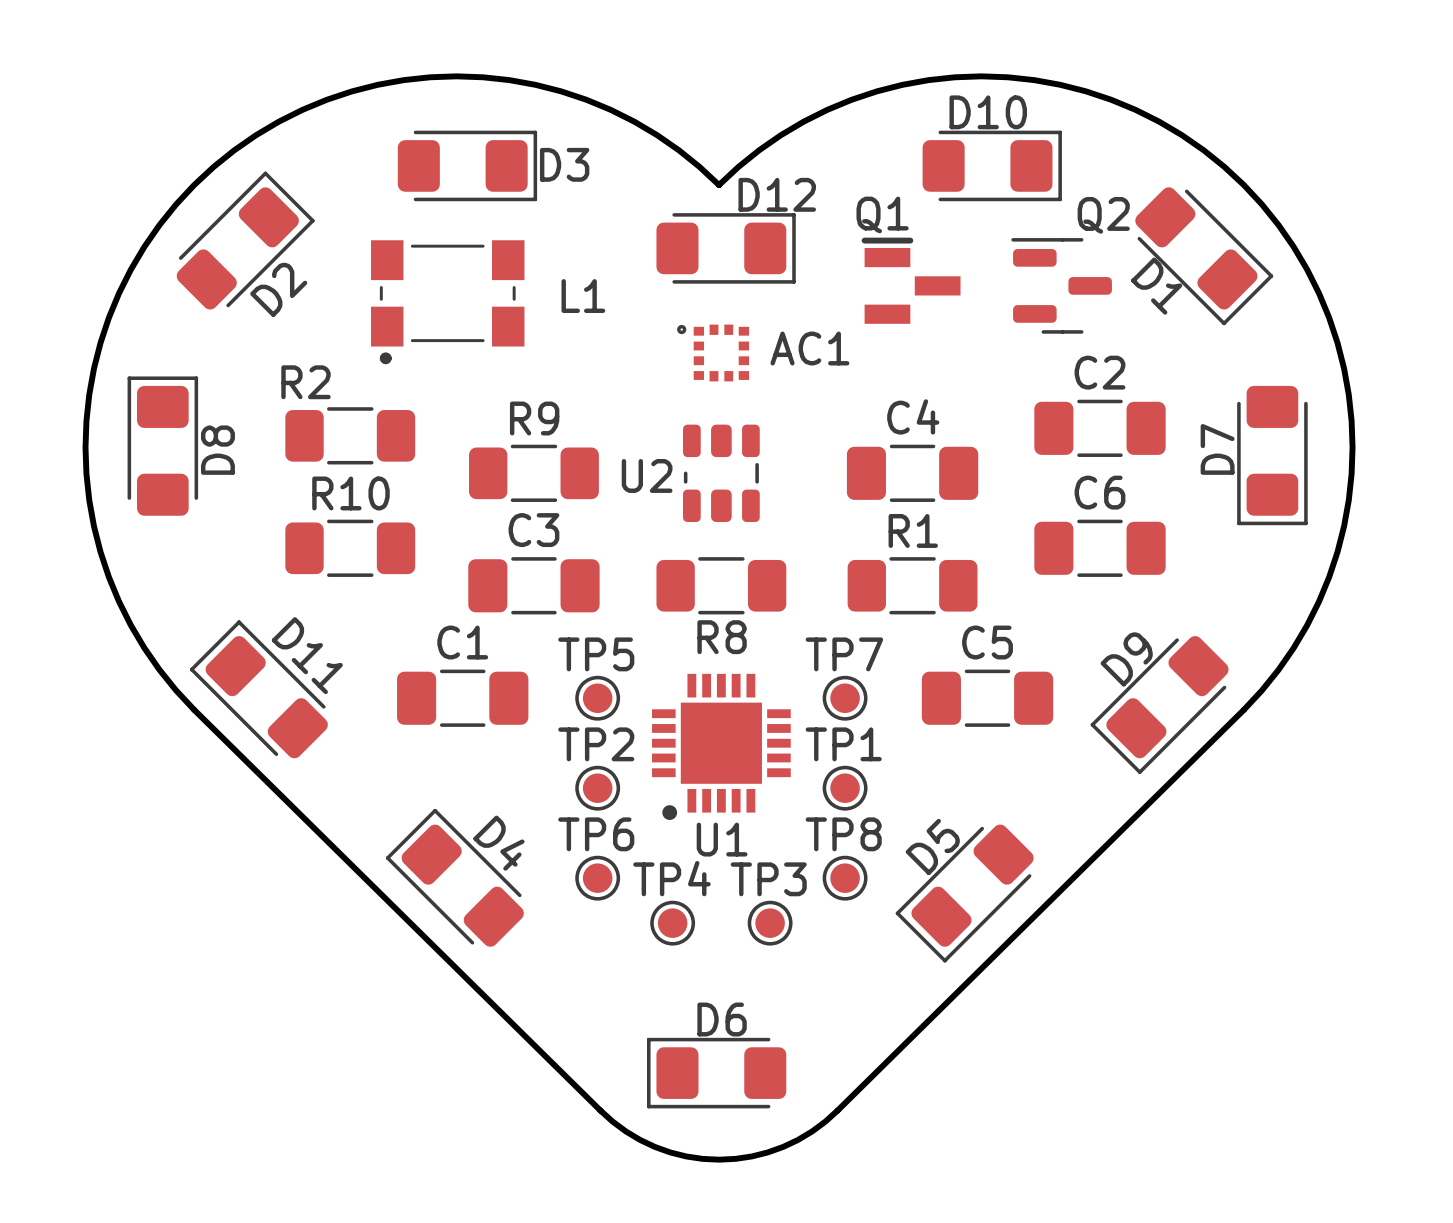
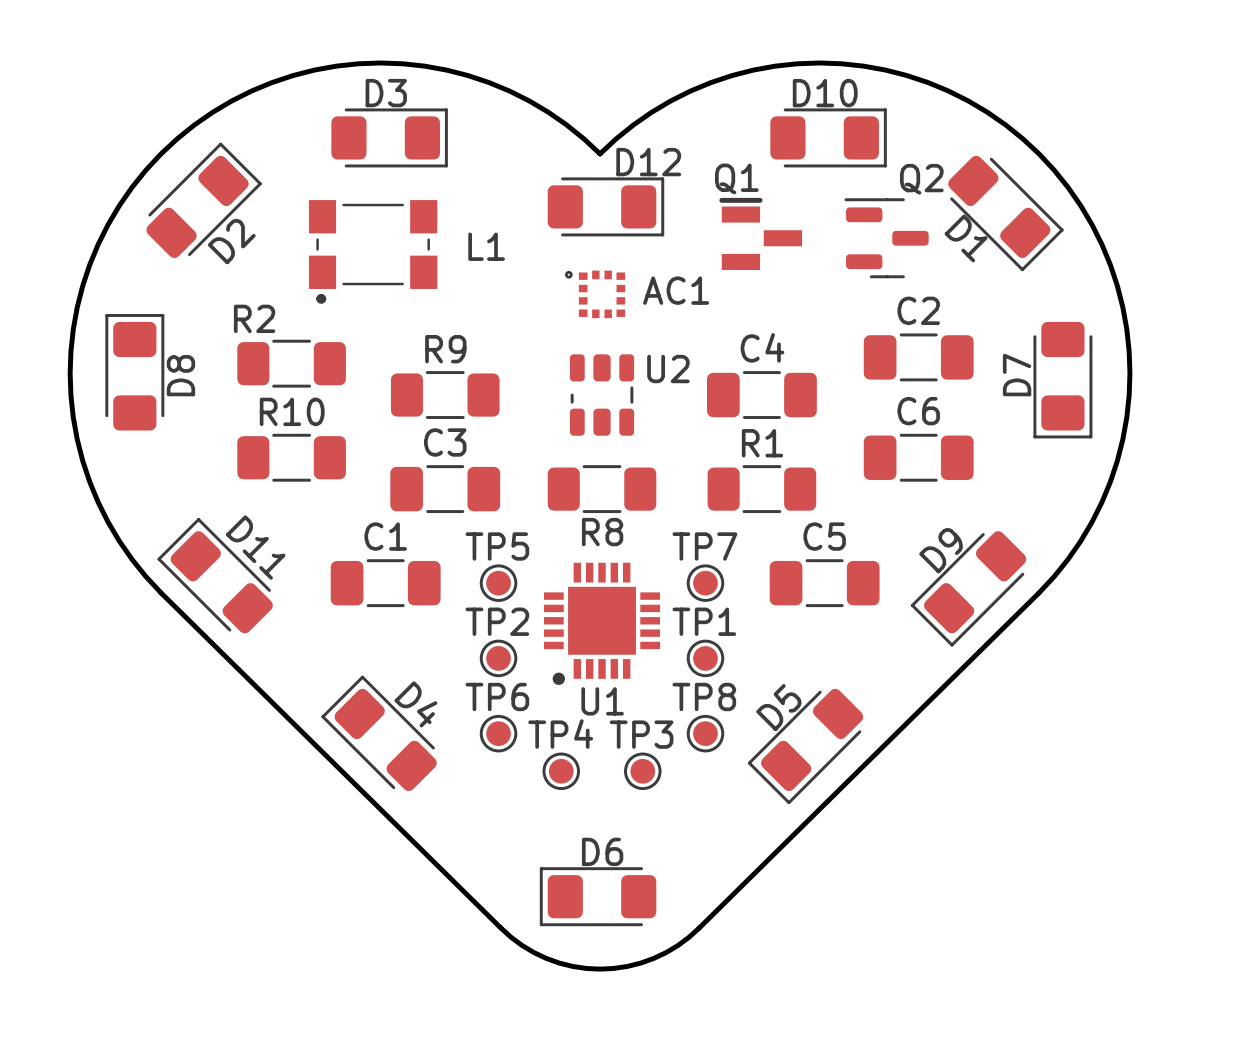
D3 name position: D3 (564, 164) -> D3 (386, 93)
U2 name position: U2 (647, 475) -> U2 (668, 369)

